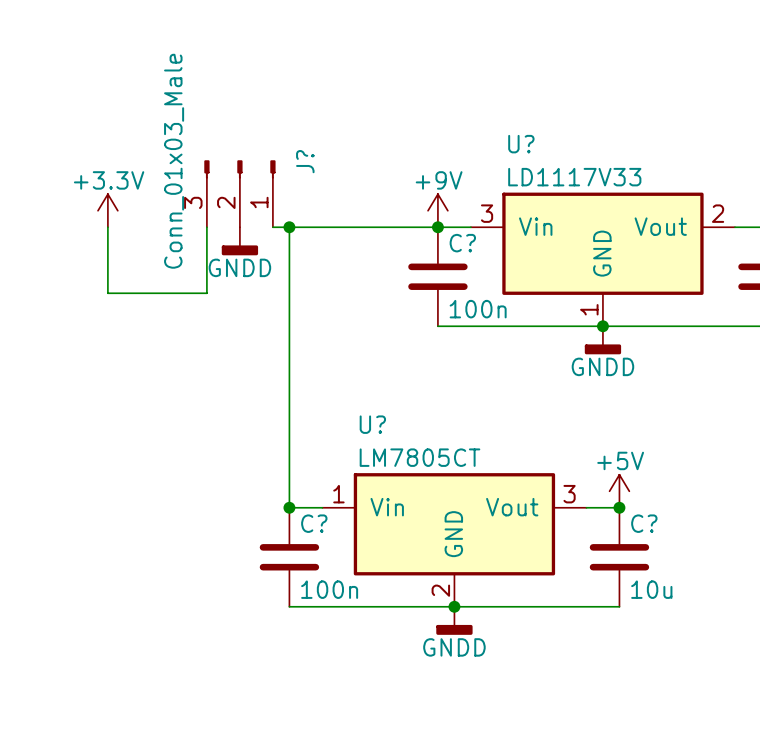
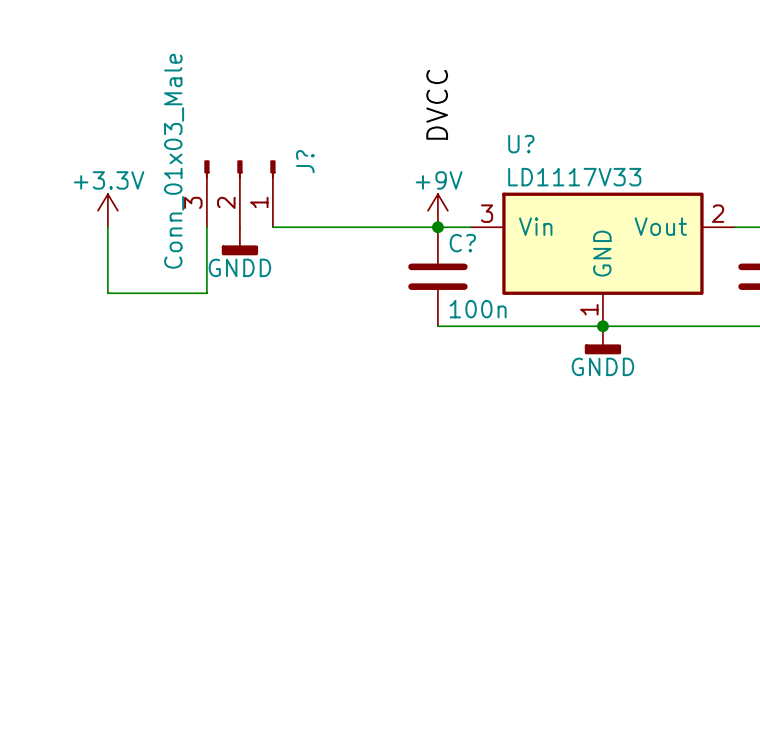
label: none -> DVCC (437, 104)
wire: (289, 227) (289, 507) (322, 507) -> none
junction: (289, 227) -> none
power symbol: +5V (619, 491) -> none
junction: (289, 507) -> none
wire: (586, 507) (619, 507) -> none
junction: (619, 507) -> none
U?: LM7805CT (454, 539) -> none
C?: 100n (289, 557) -> none
C?: 10u (619, 557) -> none
wire: (289, 606) (619, 606) -> none
junction: (454, 606) -> none
power symbol: GNDD (454, 620) -> none

